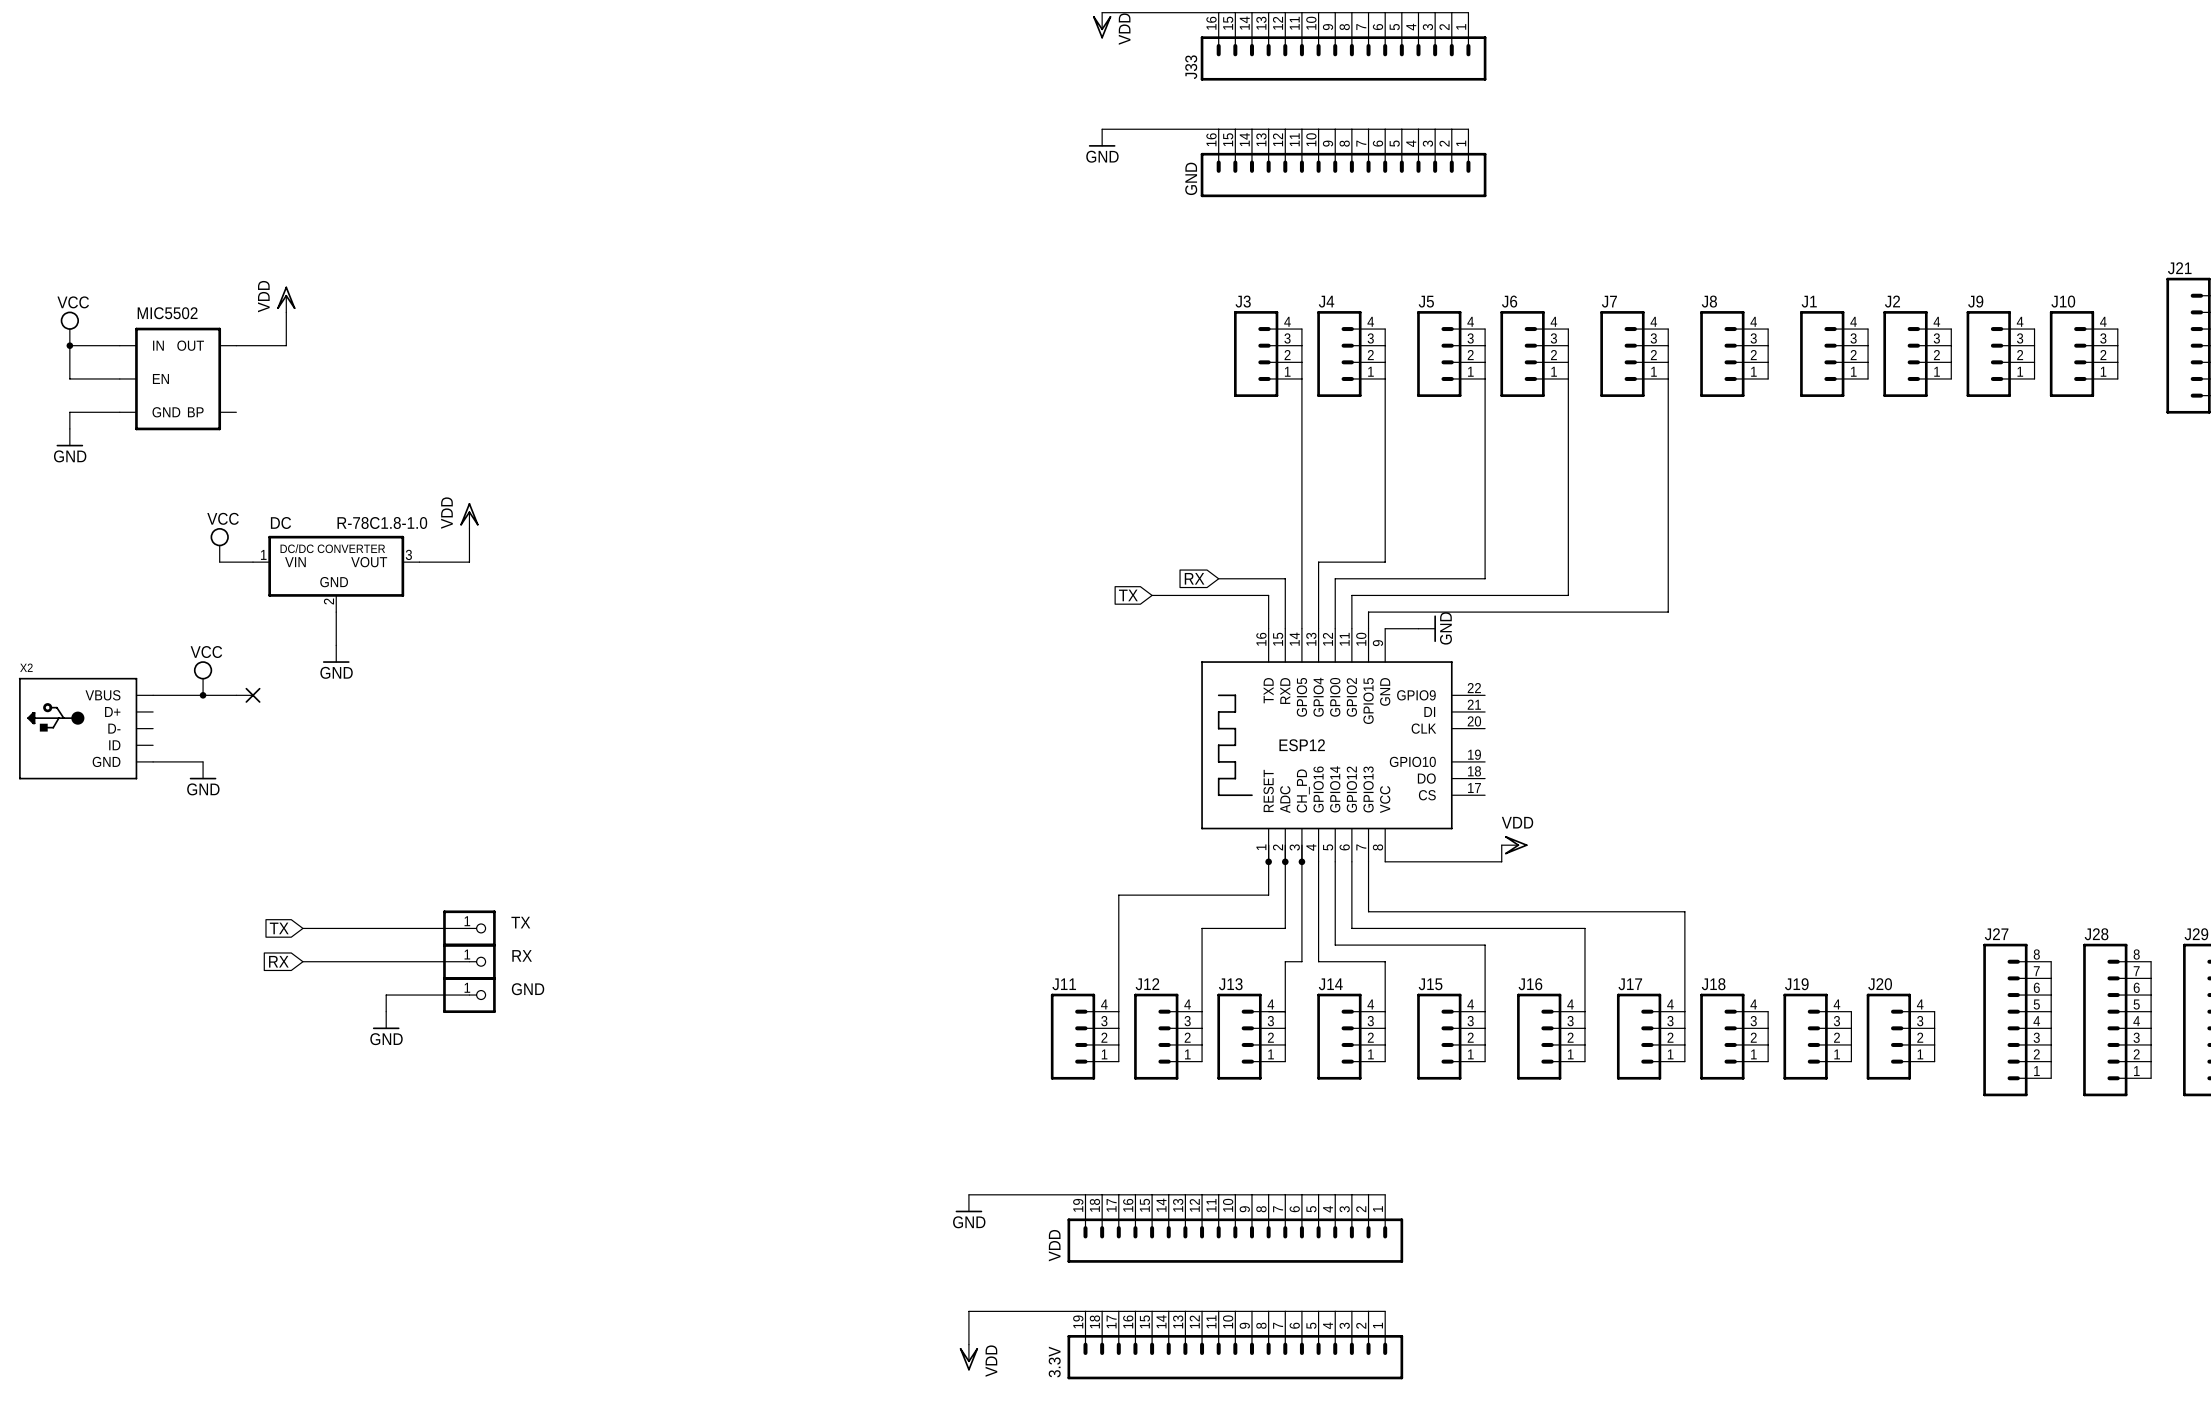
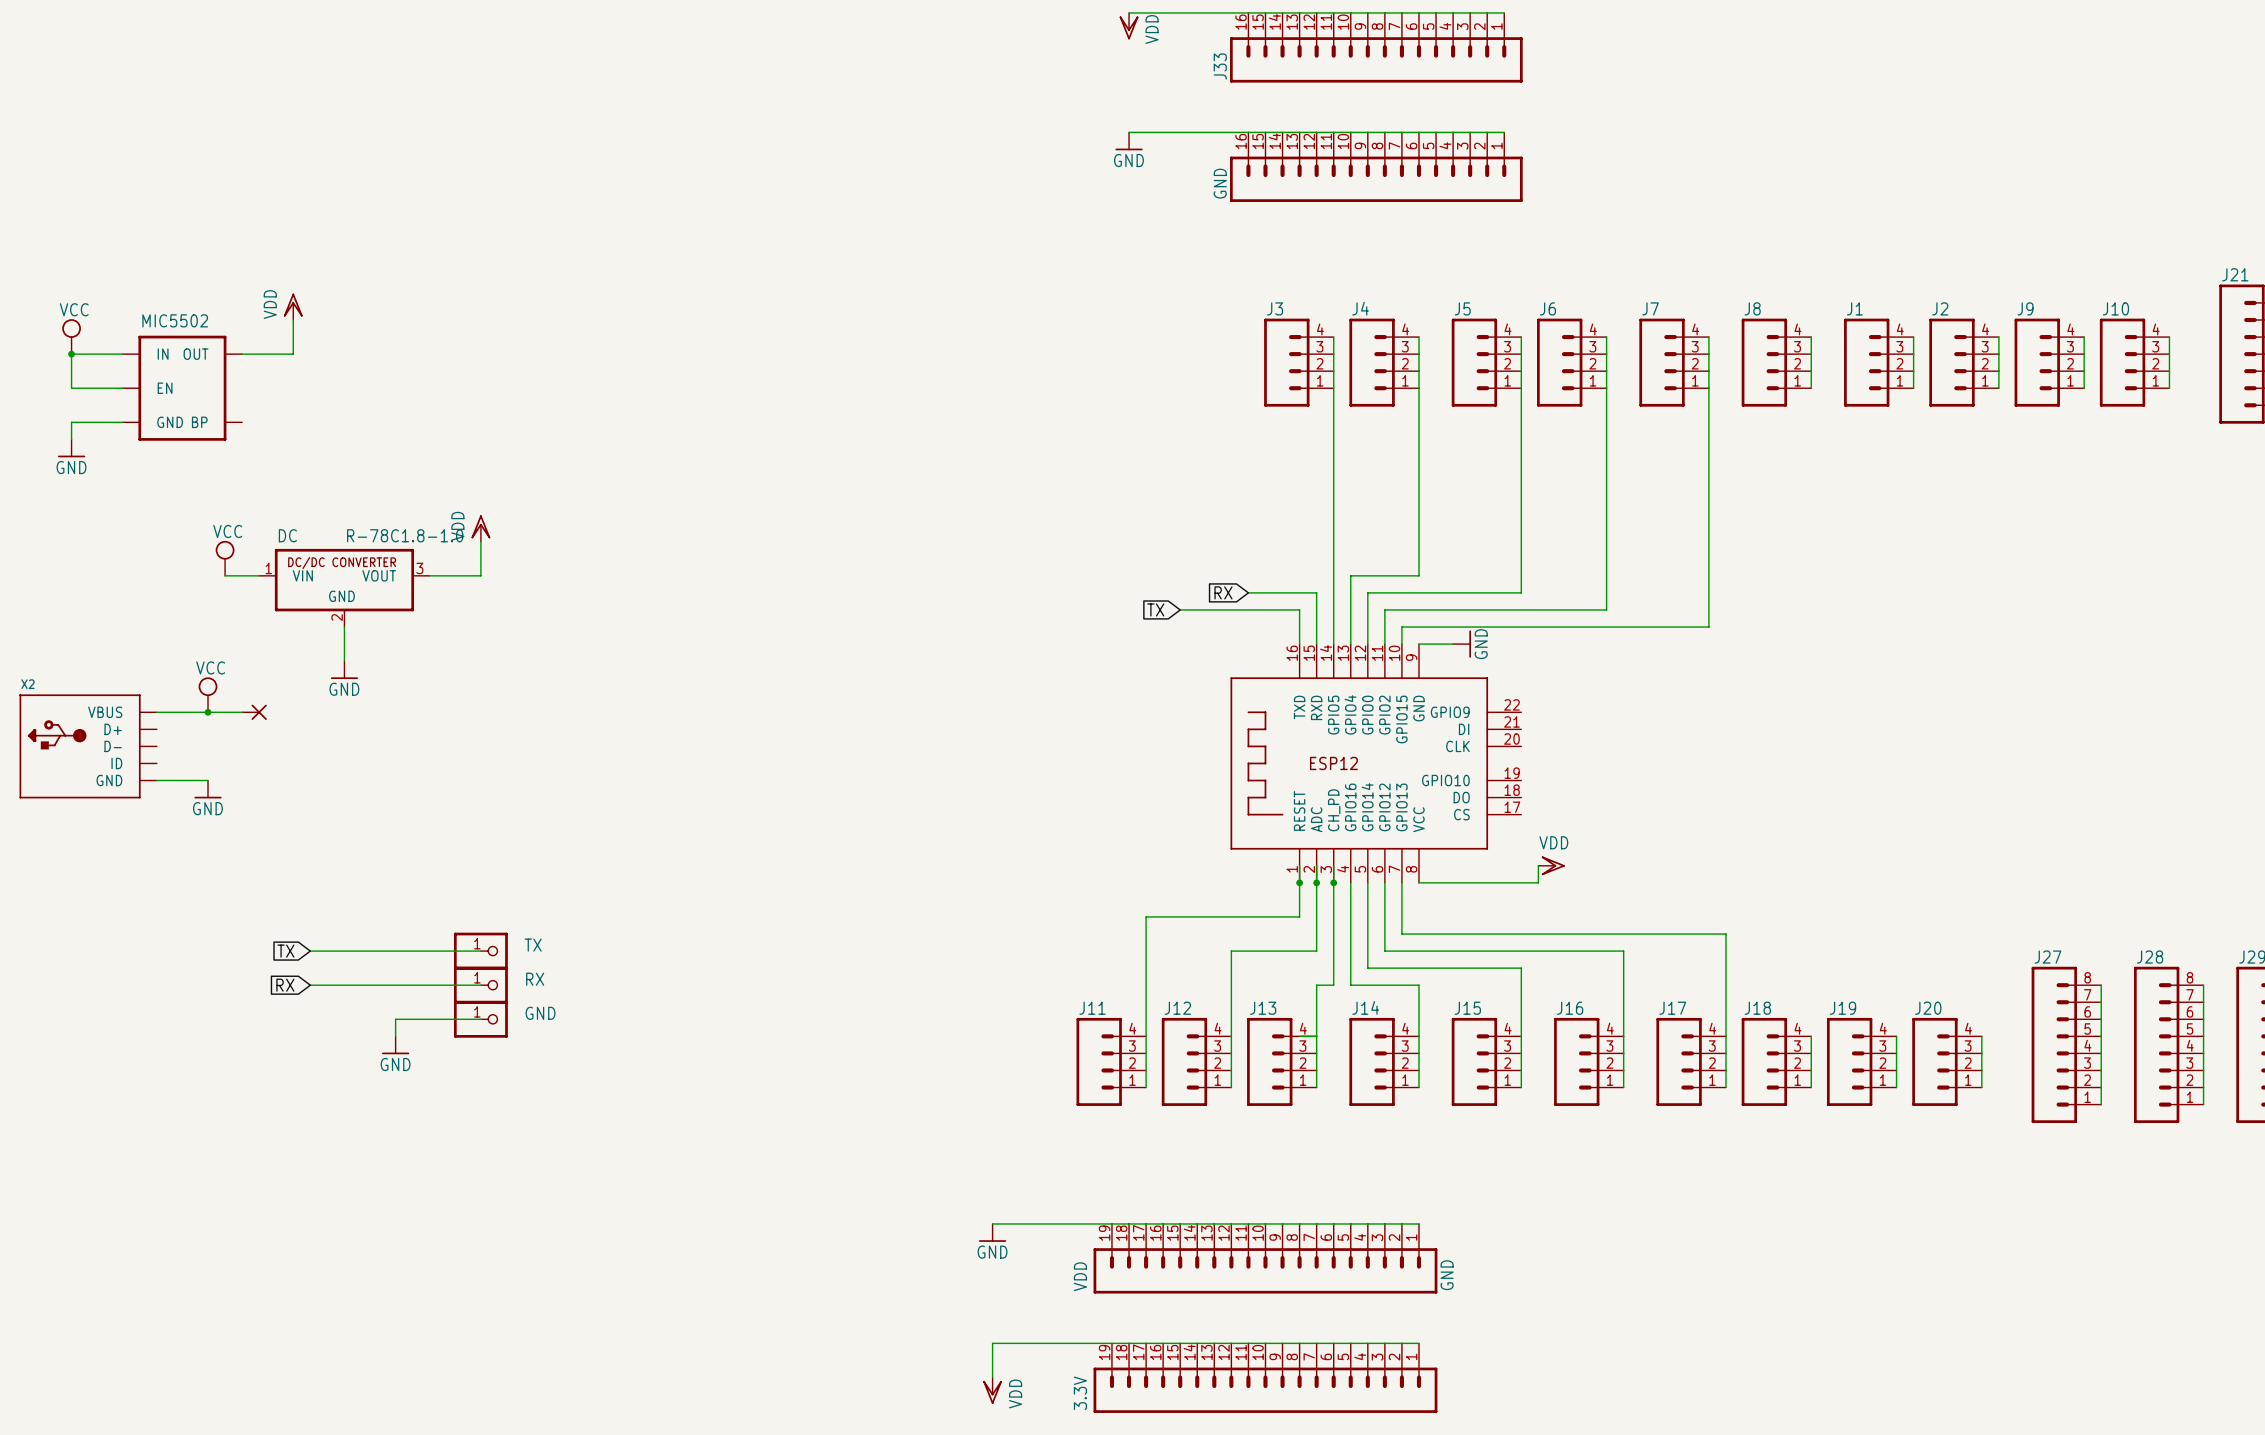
VDD value: none -> GND (1447, 1275)

